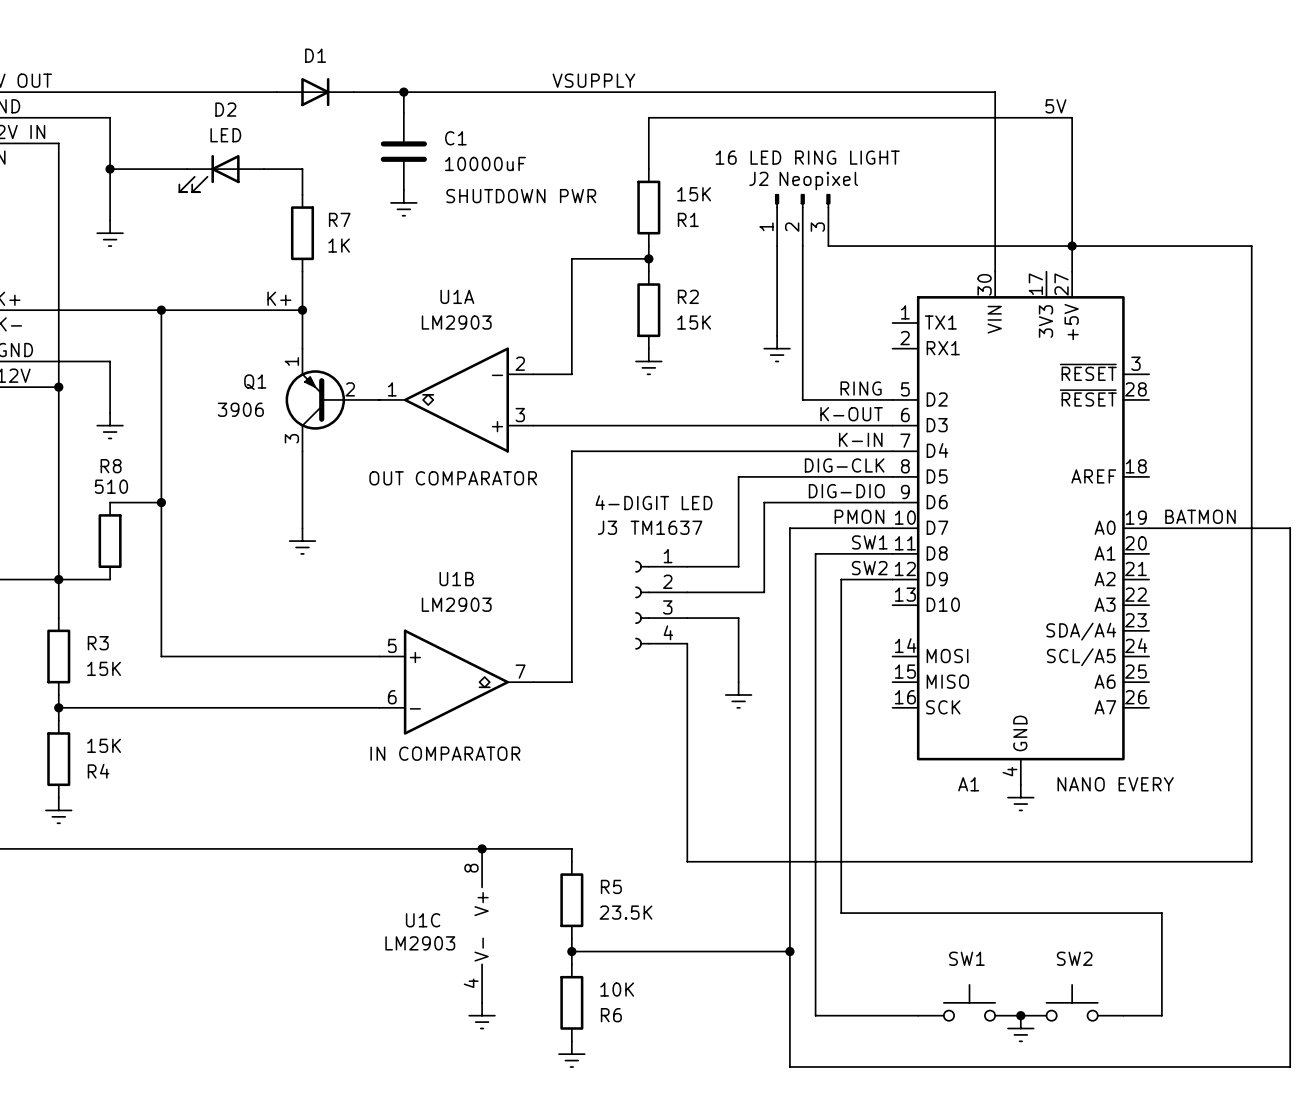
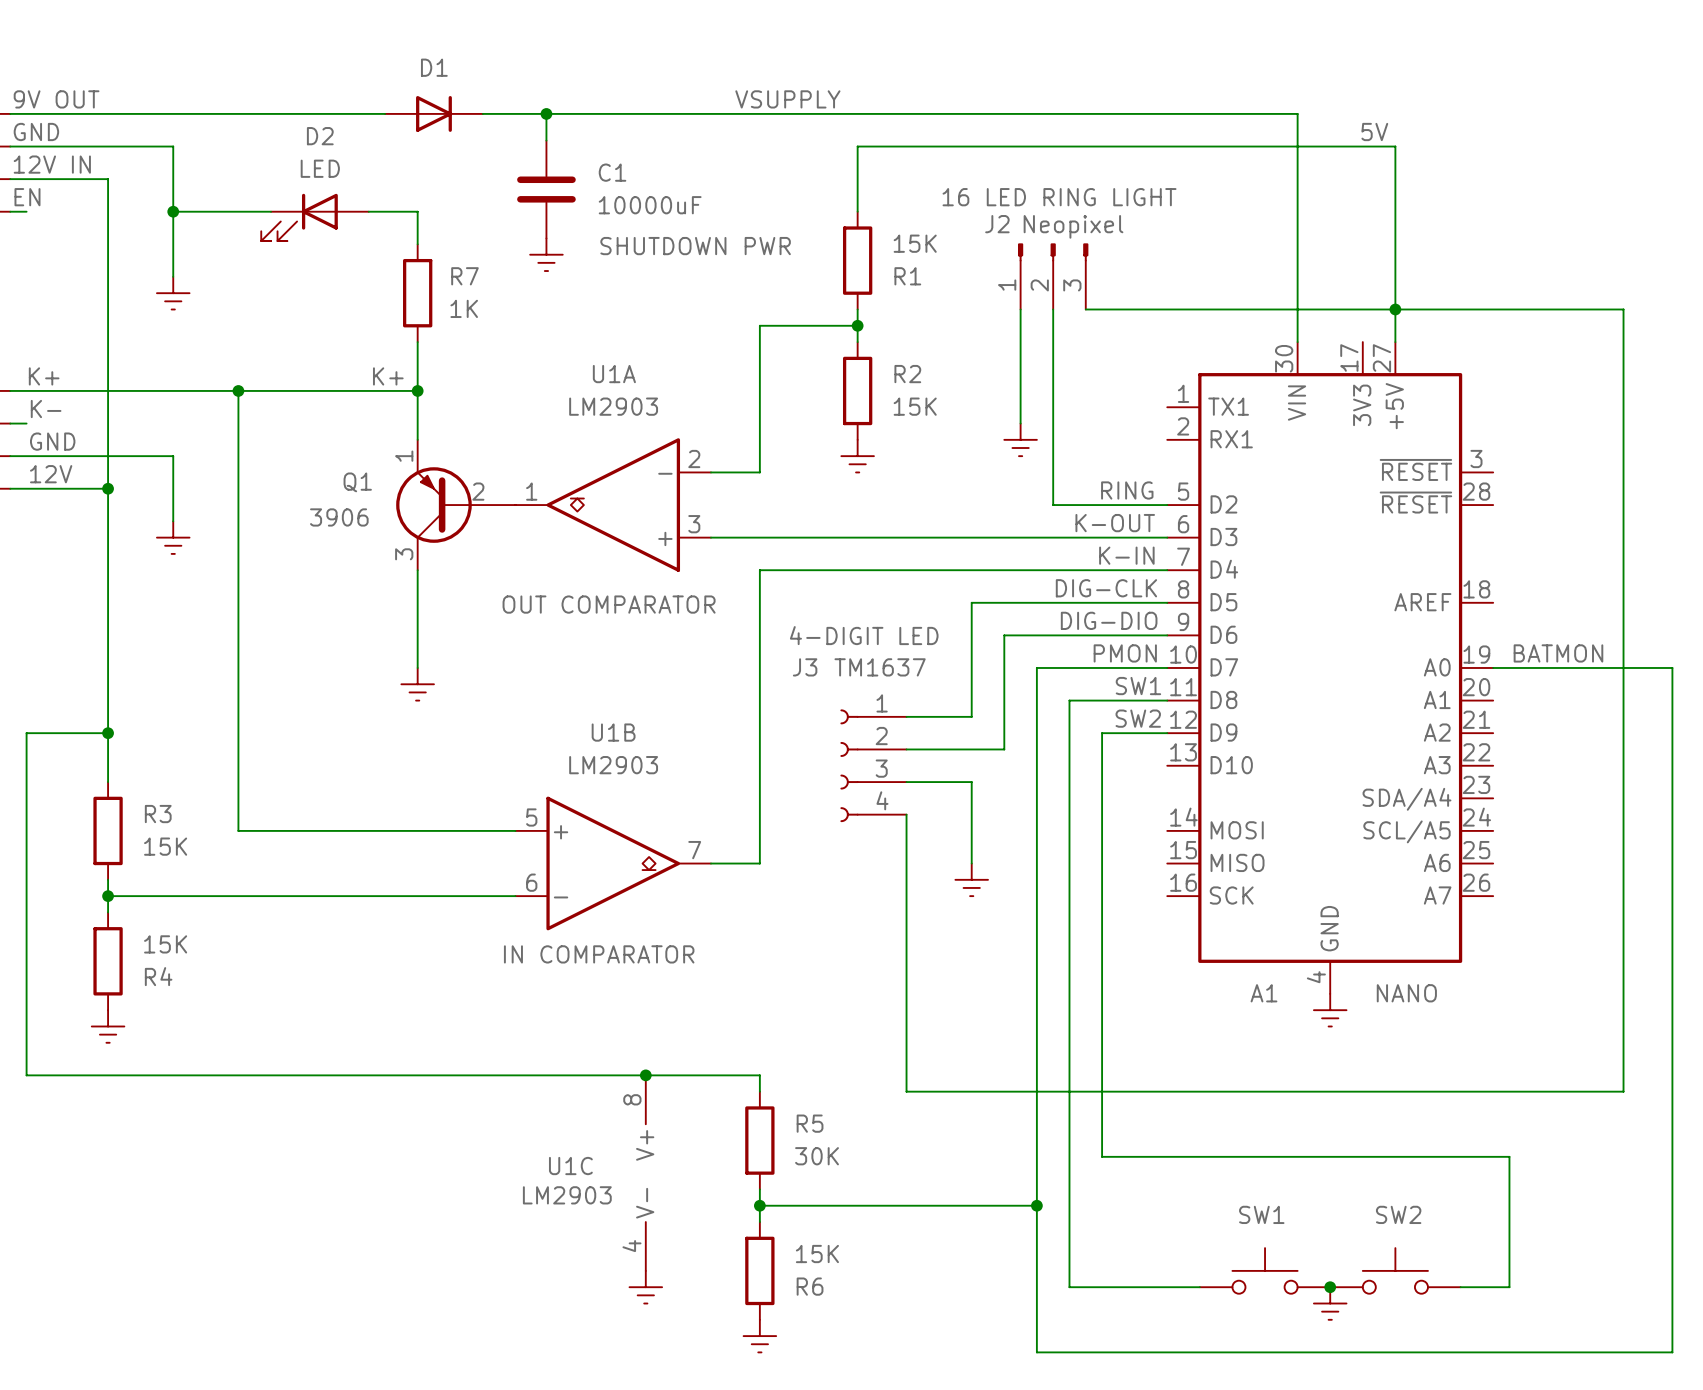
wire: (110, 502) (161, 502) -> none
junction: (161, 502) -> none
R8: 510 (110, 541) -> none
wire: (58, 579) (110, 579) -> none
A1 value: NANO EVERY (1115, 784) -> NANO (1406, 993)
R5 value: 23.5K (626, 912) -> 30K (817, 1156)
R6 value: 10K (617, 989) -> 15K (817, 1254)

